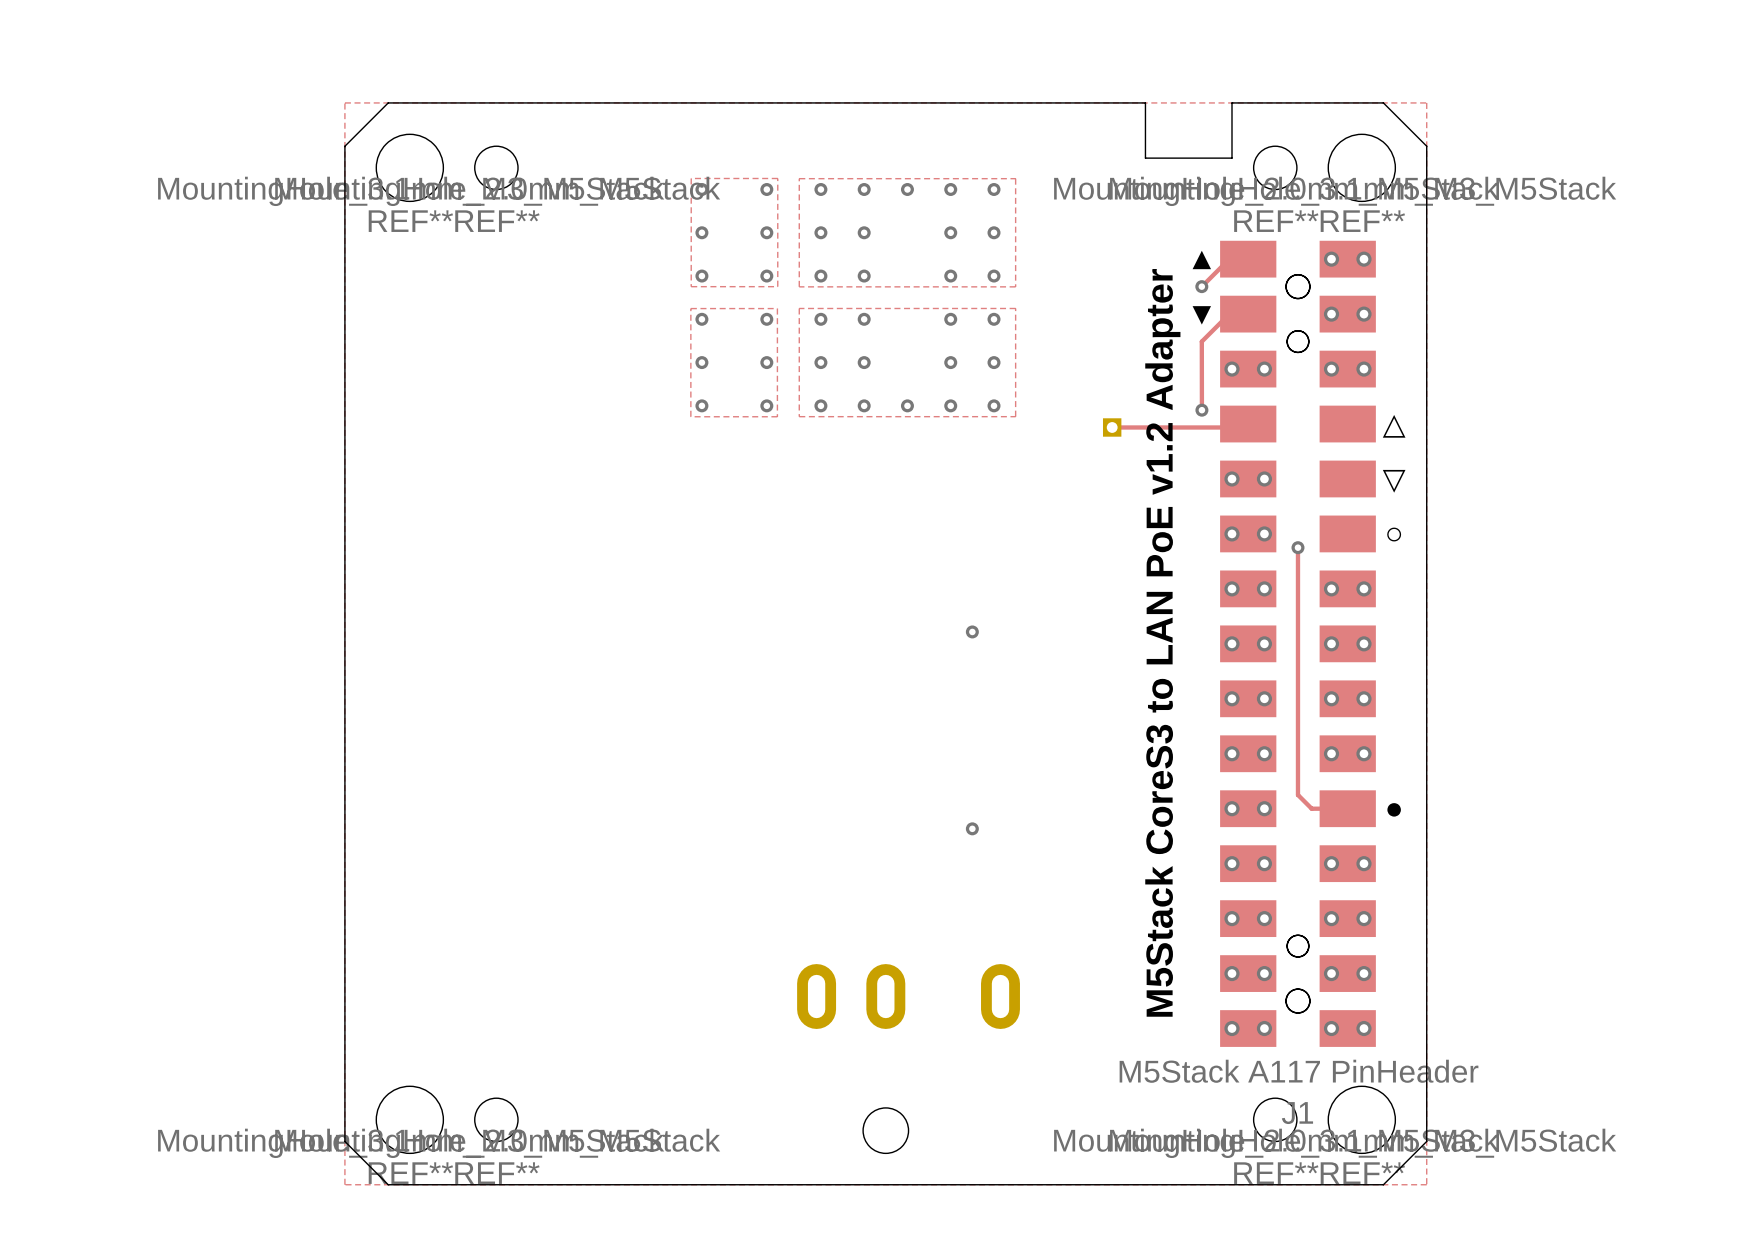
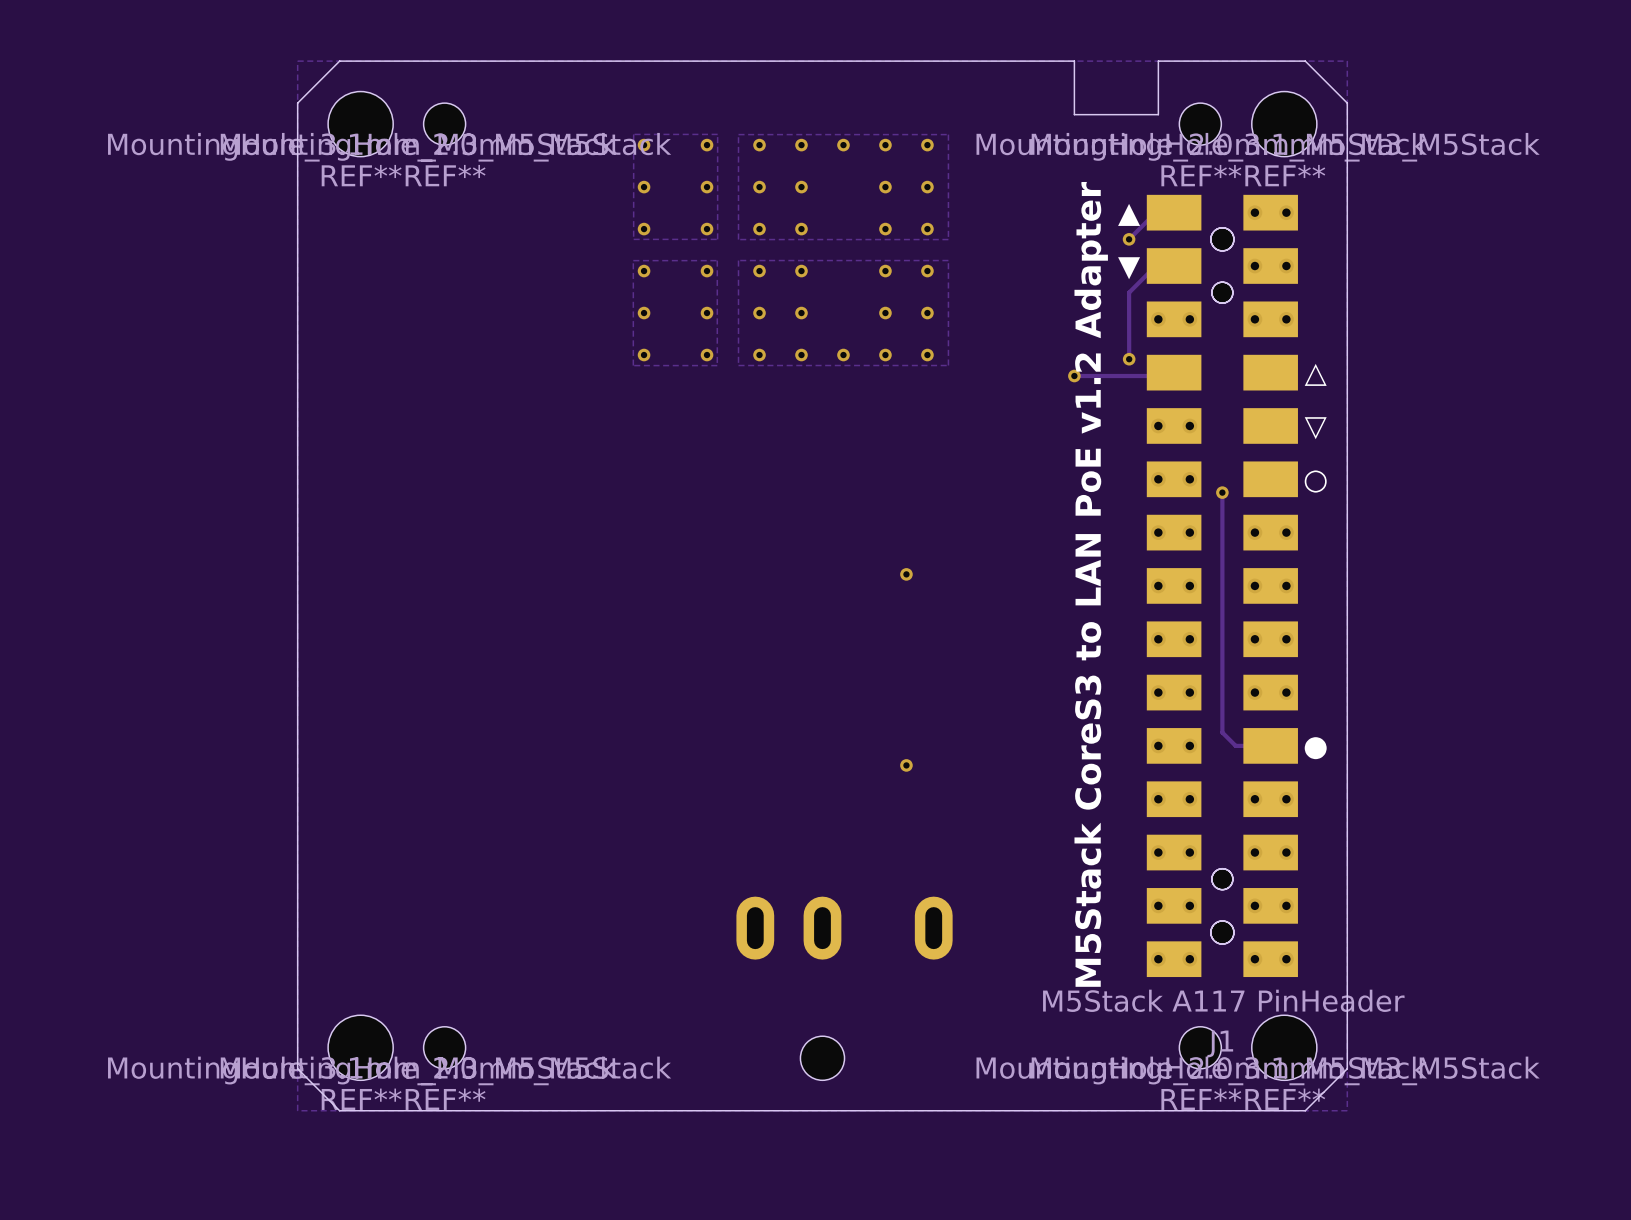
track: (1112, 427) (1145, 427) -> none
part: (1112, 427) -> none
via: none -> (1074, 376)

